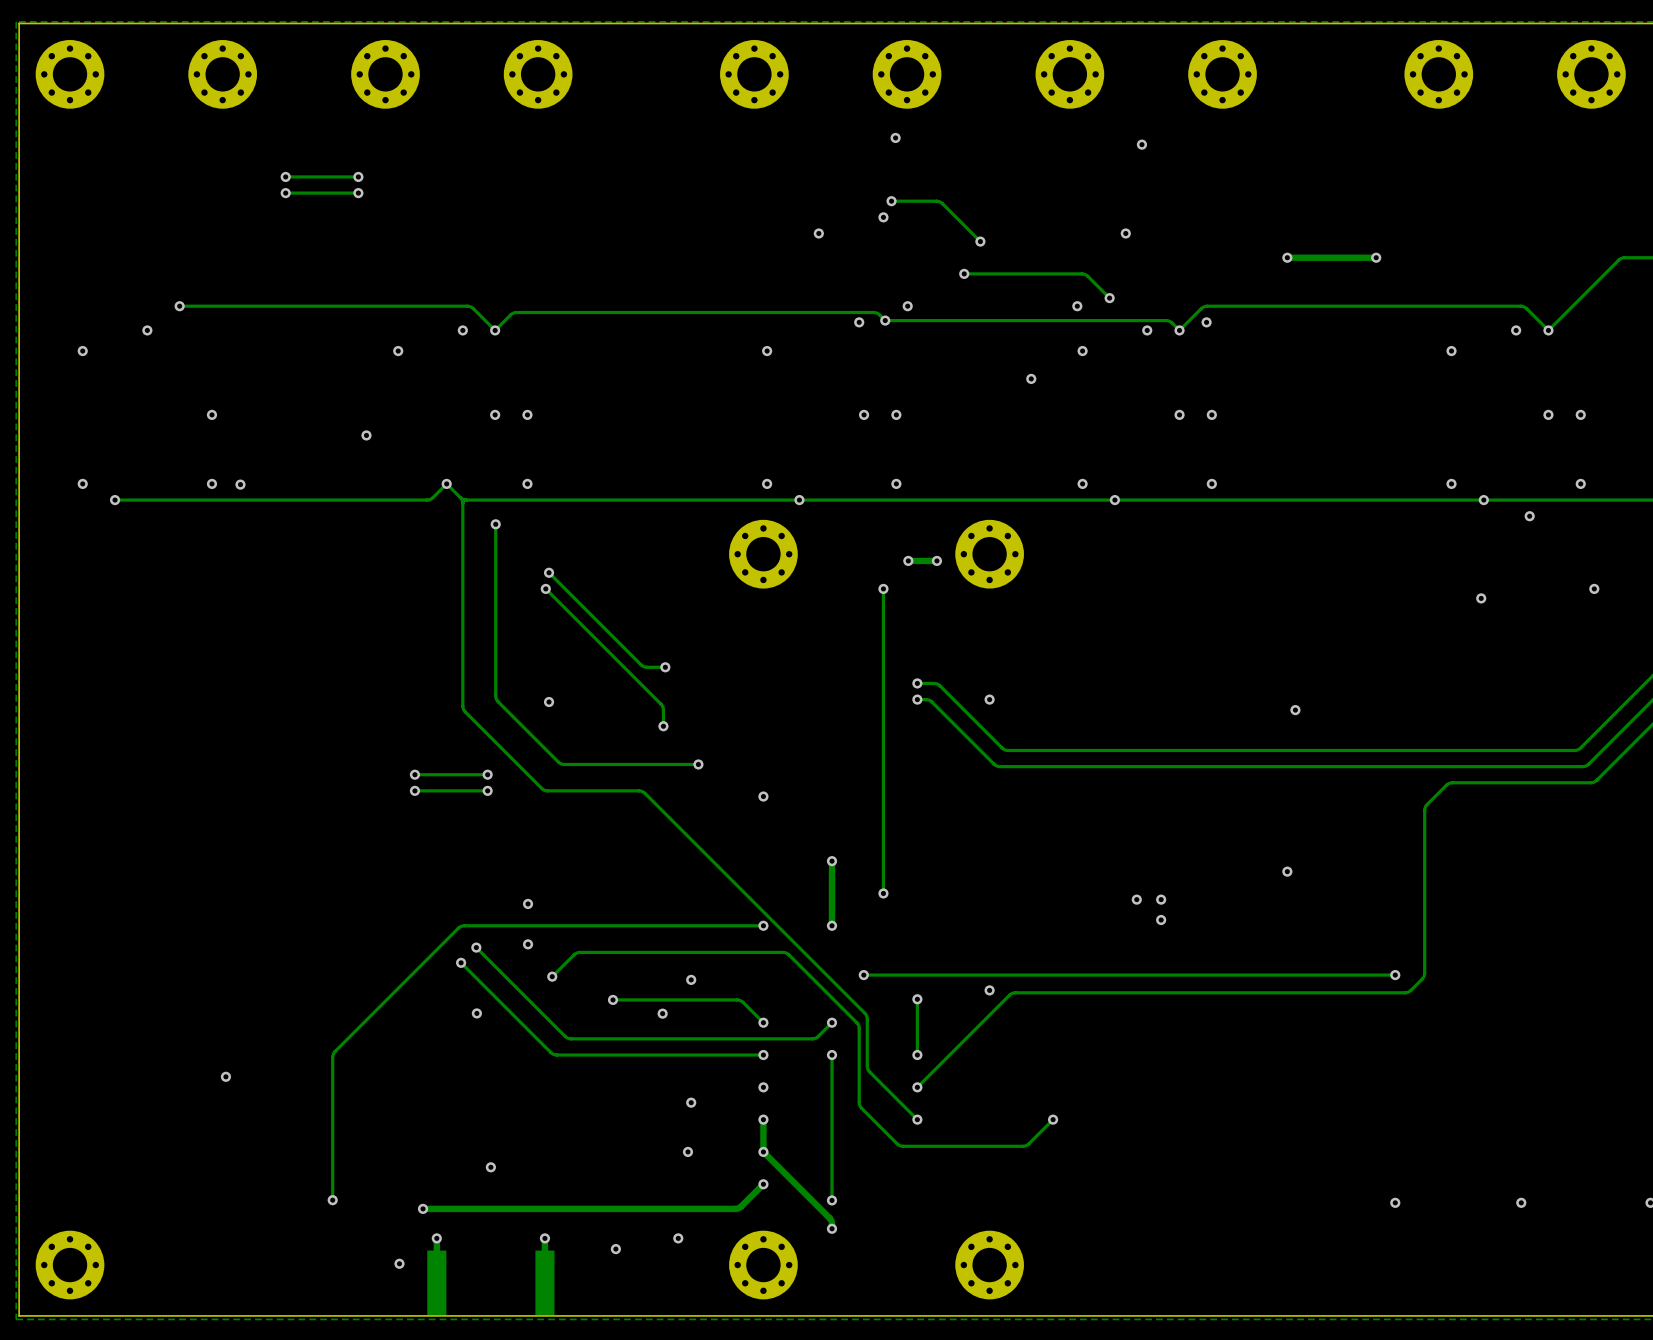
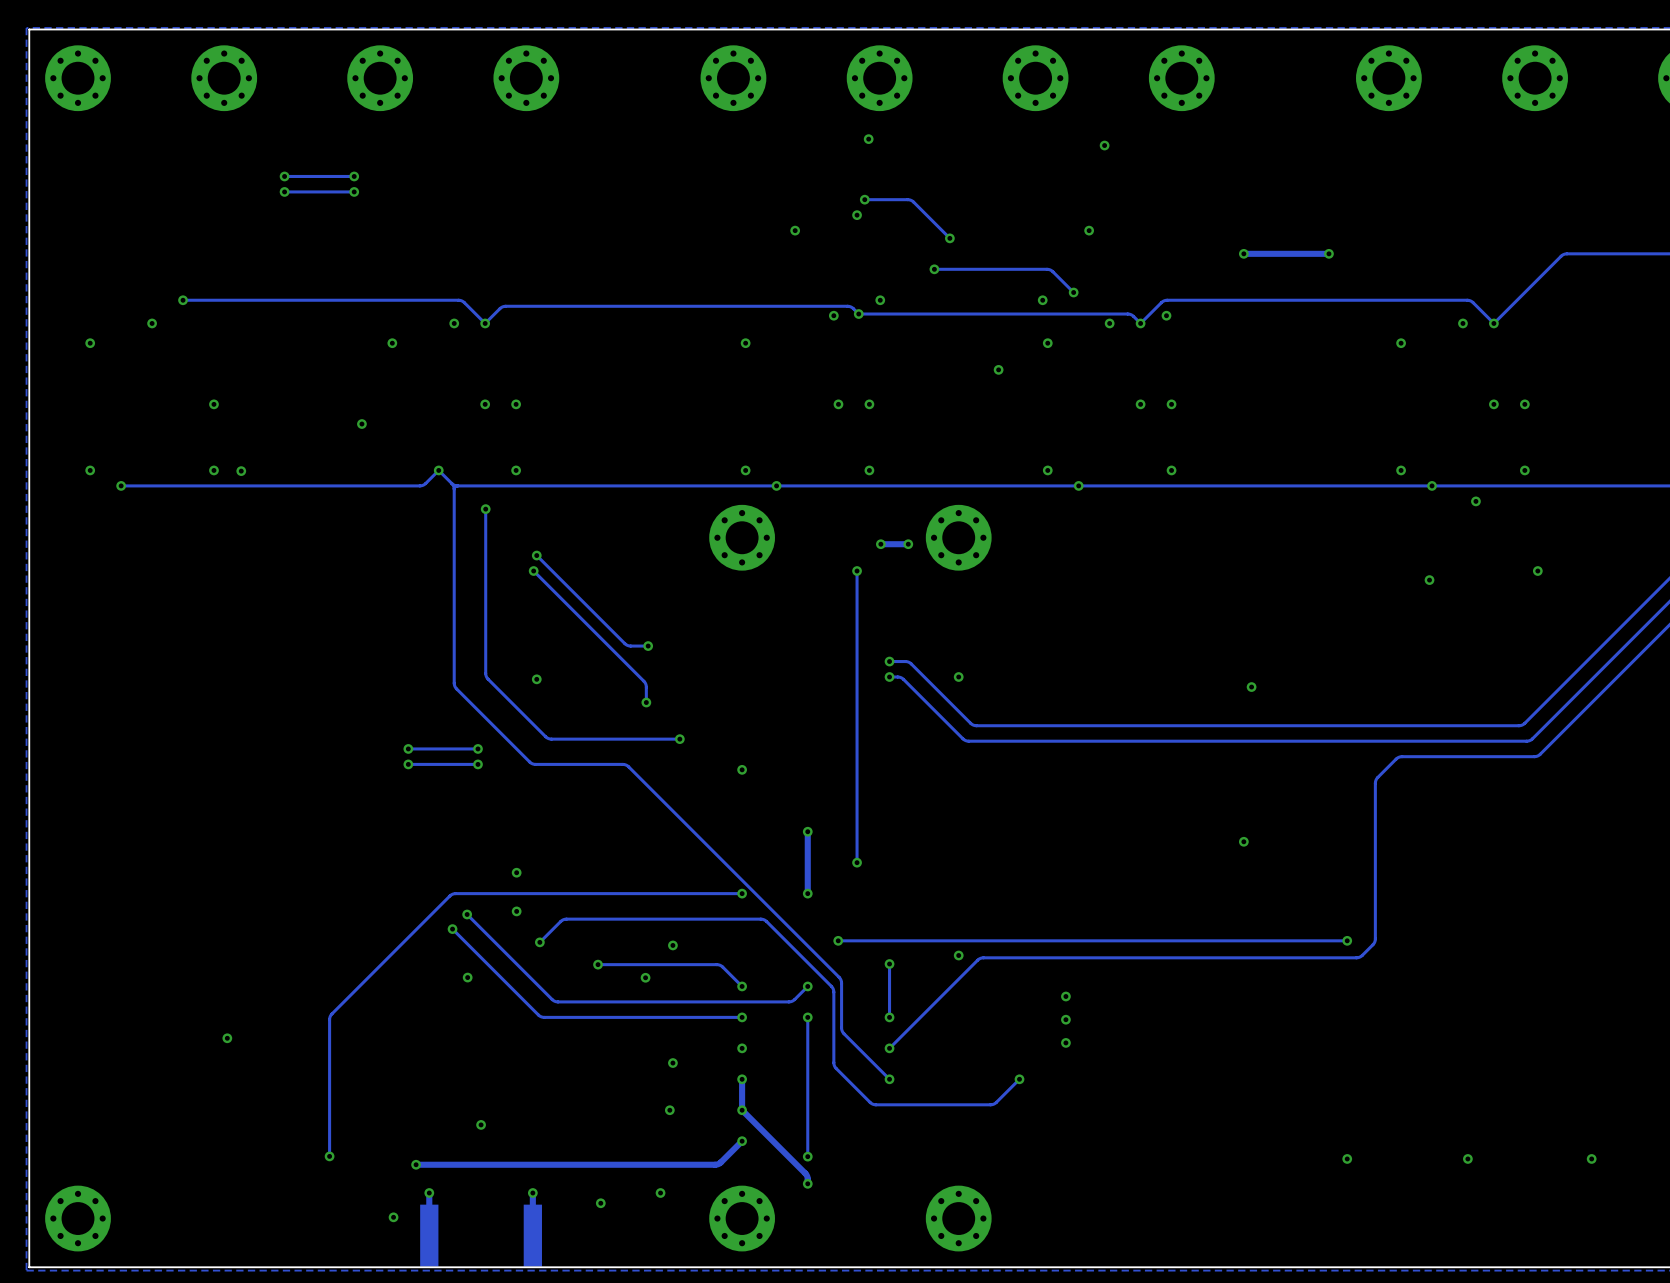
via: (1136, 899) -> none
via: (1161, 899) -> none
via: (1161, 919) -> none
via: none -> (1065, 996)
via: none -> (1065, 1019)
via: none -> (1065, 1042)

